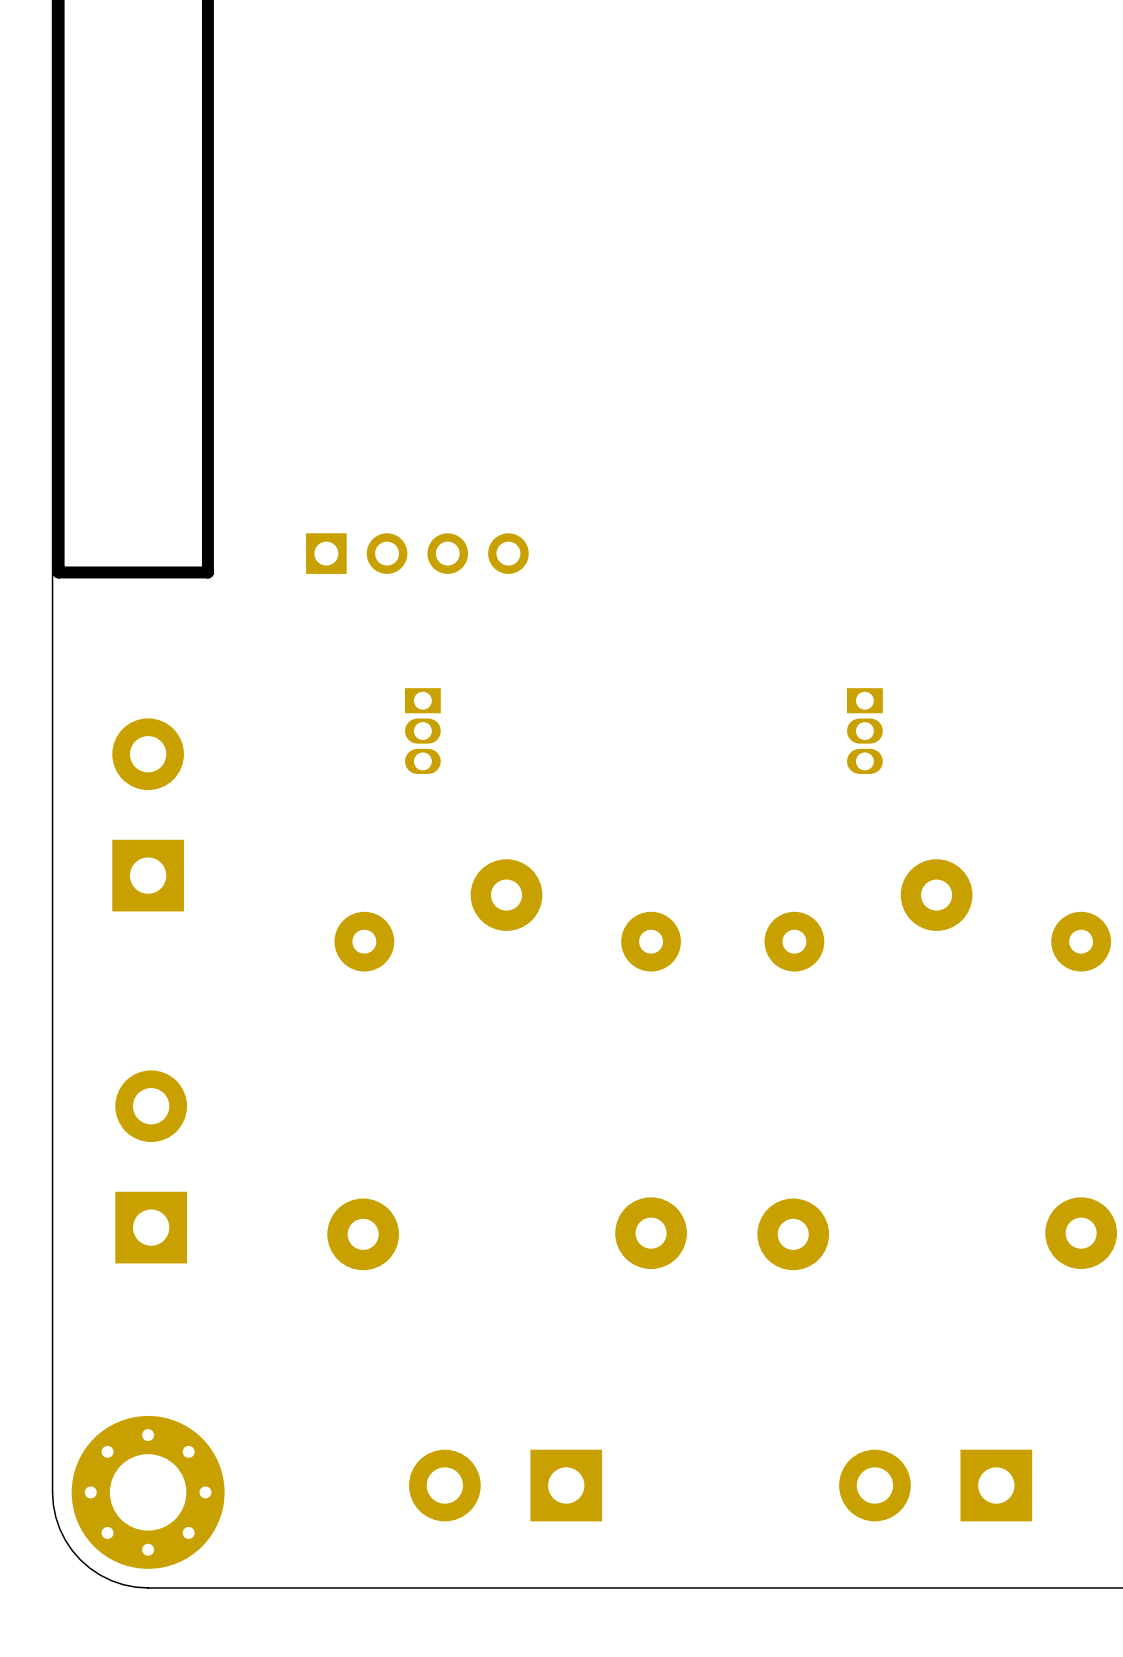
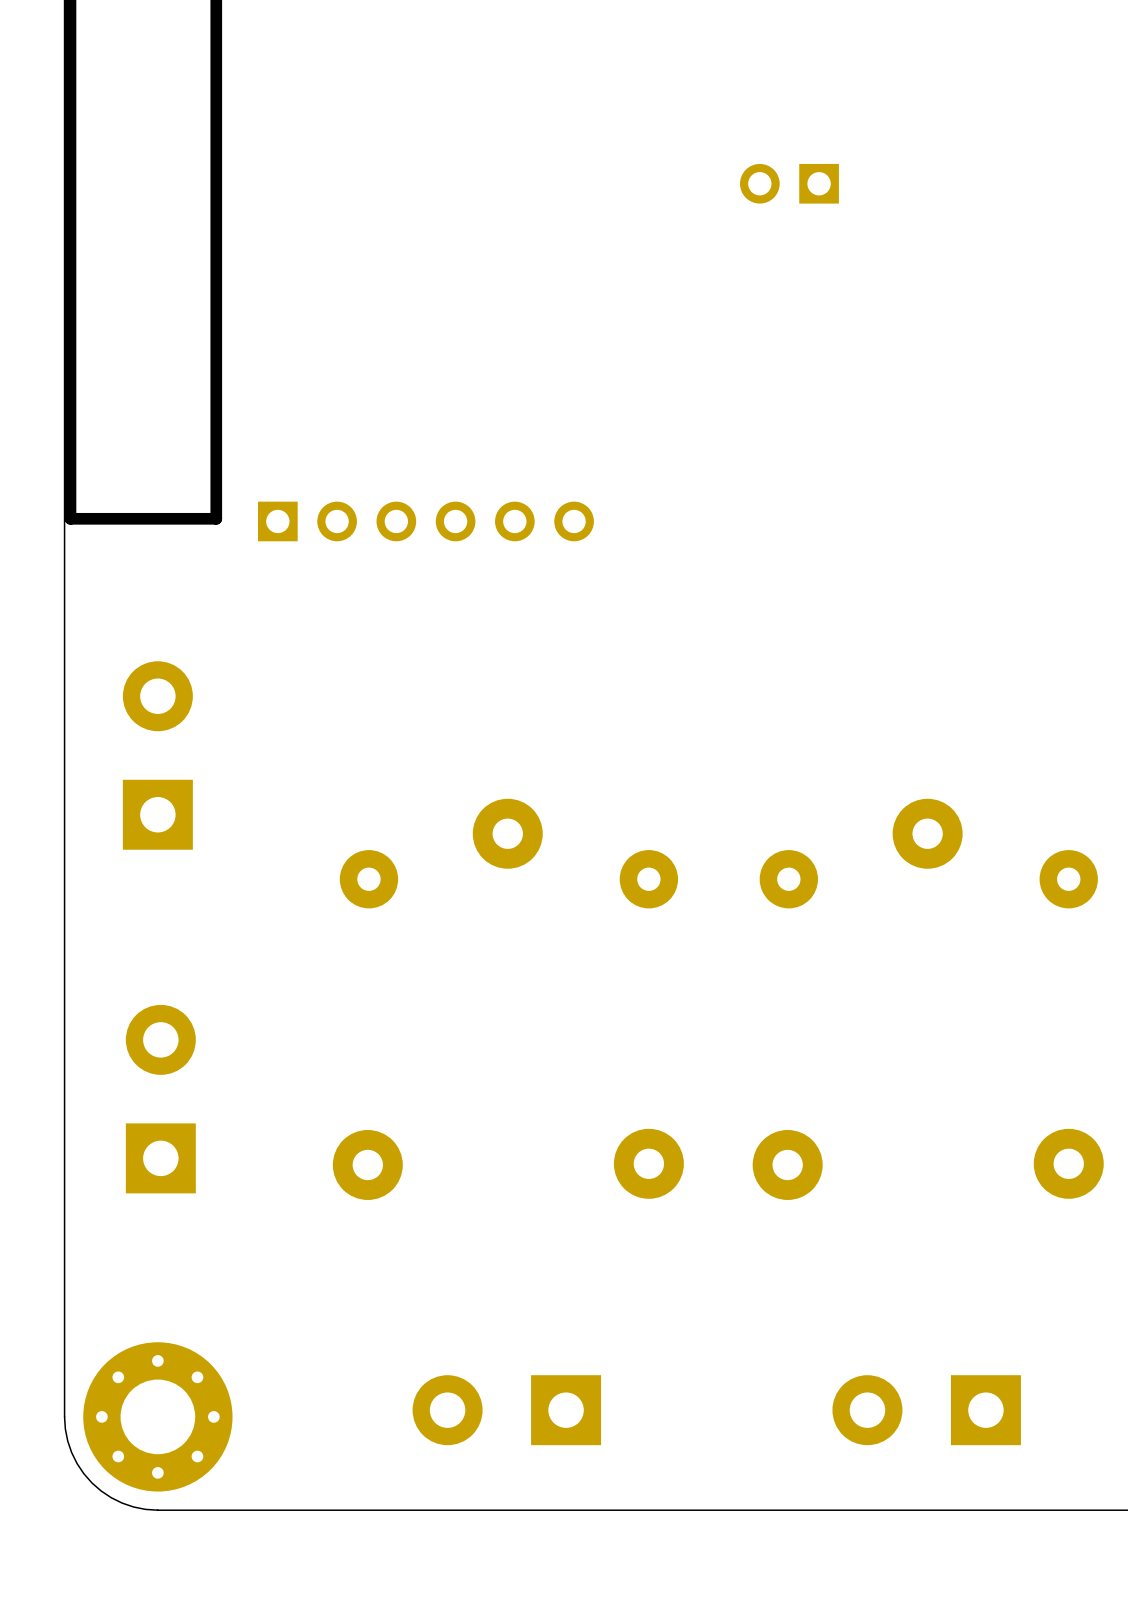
part: none -> (789, 183)
part footprint: [306, 533, 529, 574] -> [258, 501, 594, 542]
part: (422, 731) -> none
part: (864, 731) -> none

